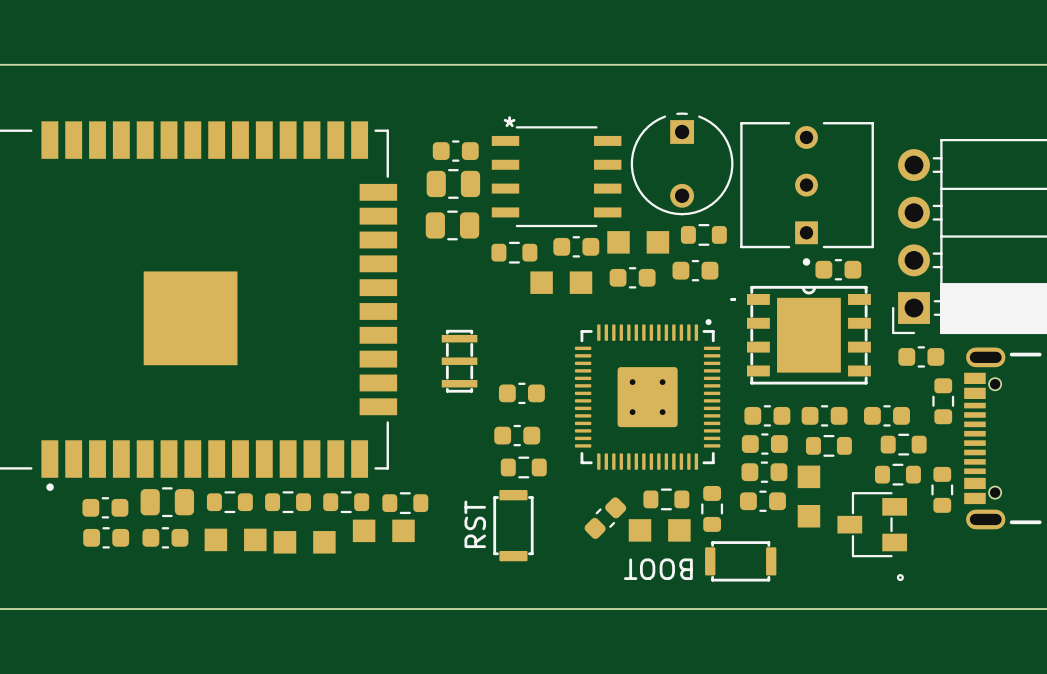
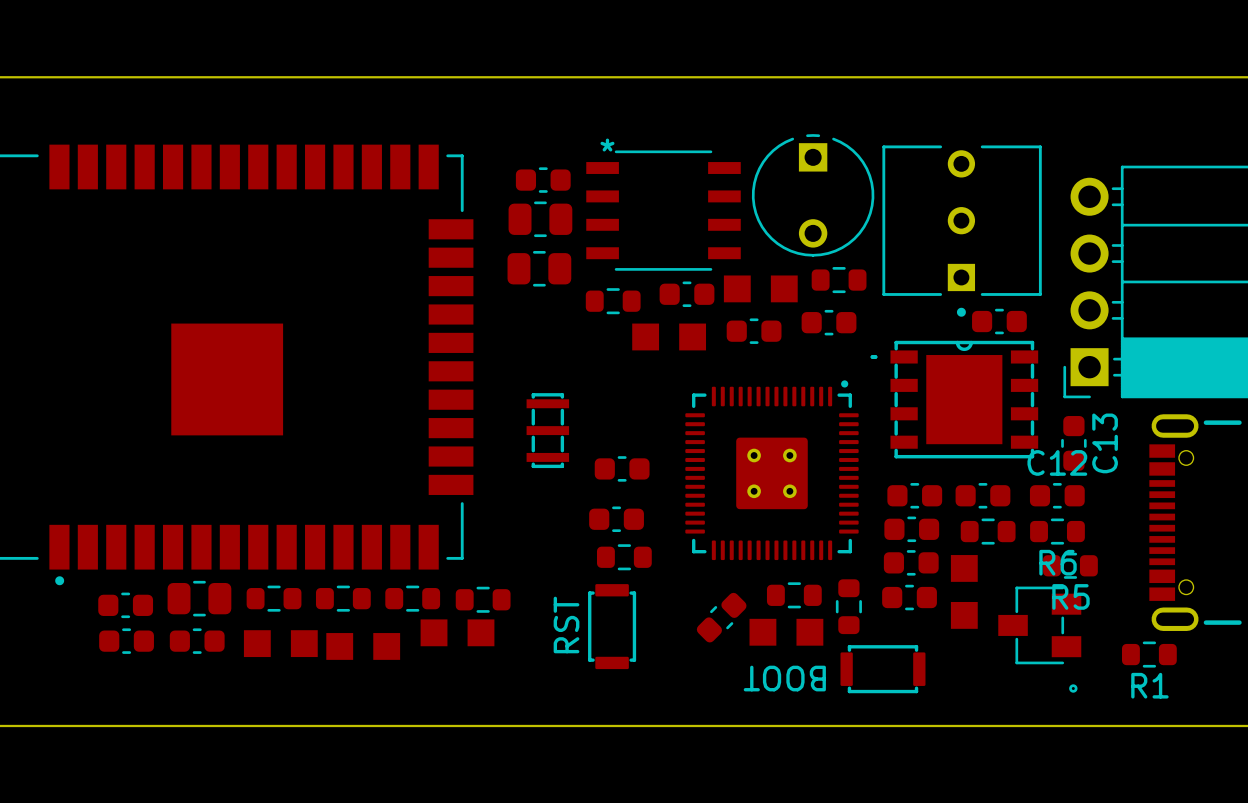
part: (921, 356) -> none
C13: none -> (1073, 443)
C12 name: none -> C12 (1057, 462)
part: (943, 401) -> none
R6 position: (903, 444) -> (1057, 531)
R6 name: none -> R6 (1058, 562)
part: (942, 489) -> none
R5 name: none -> R5 (1070, 596)
R1: none -> (1149, 654)

